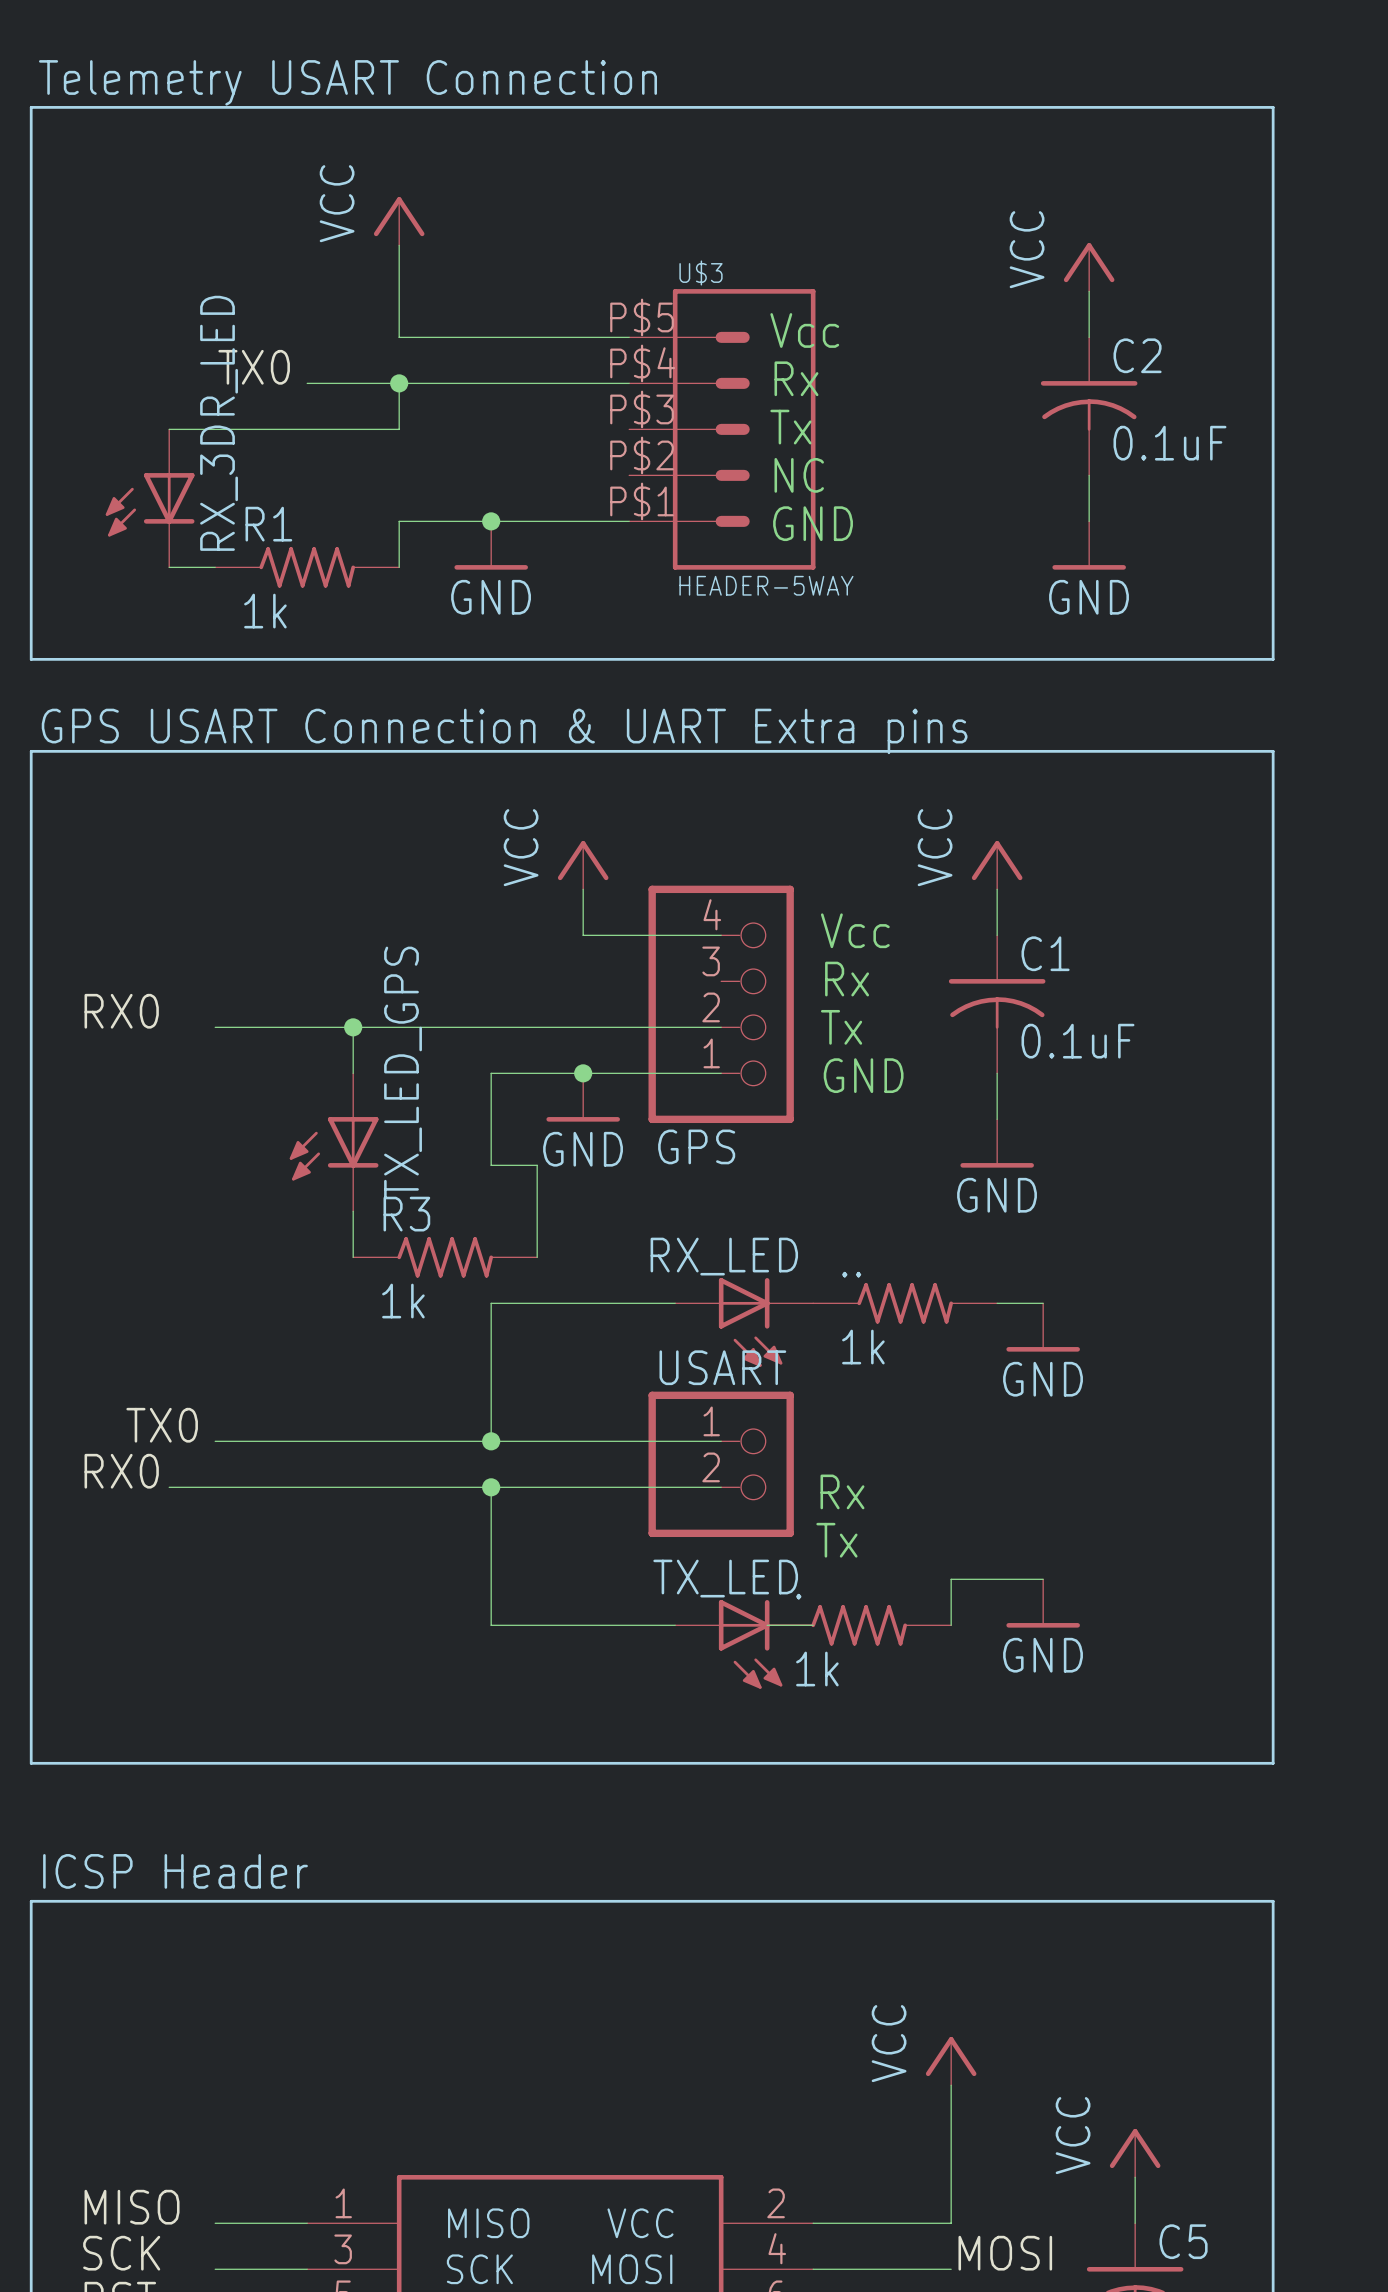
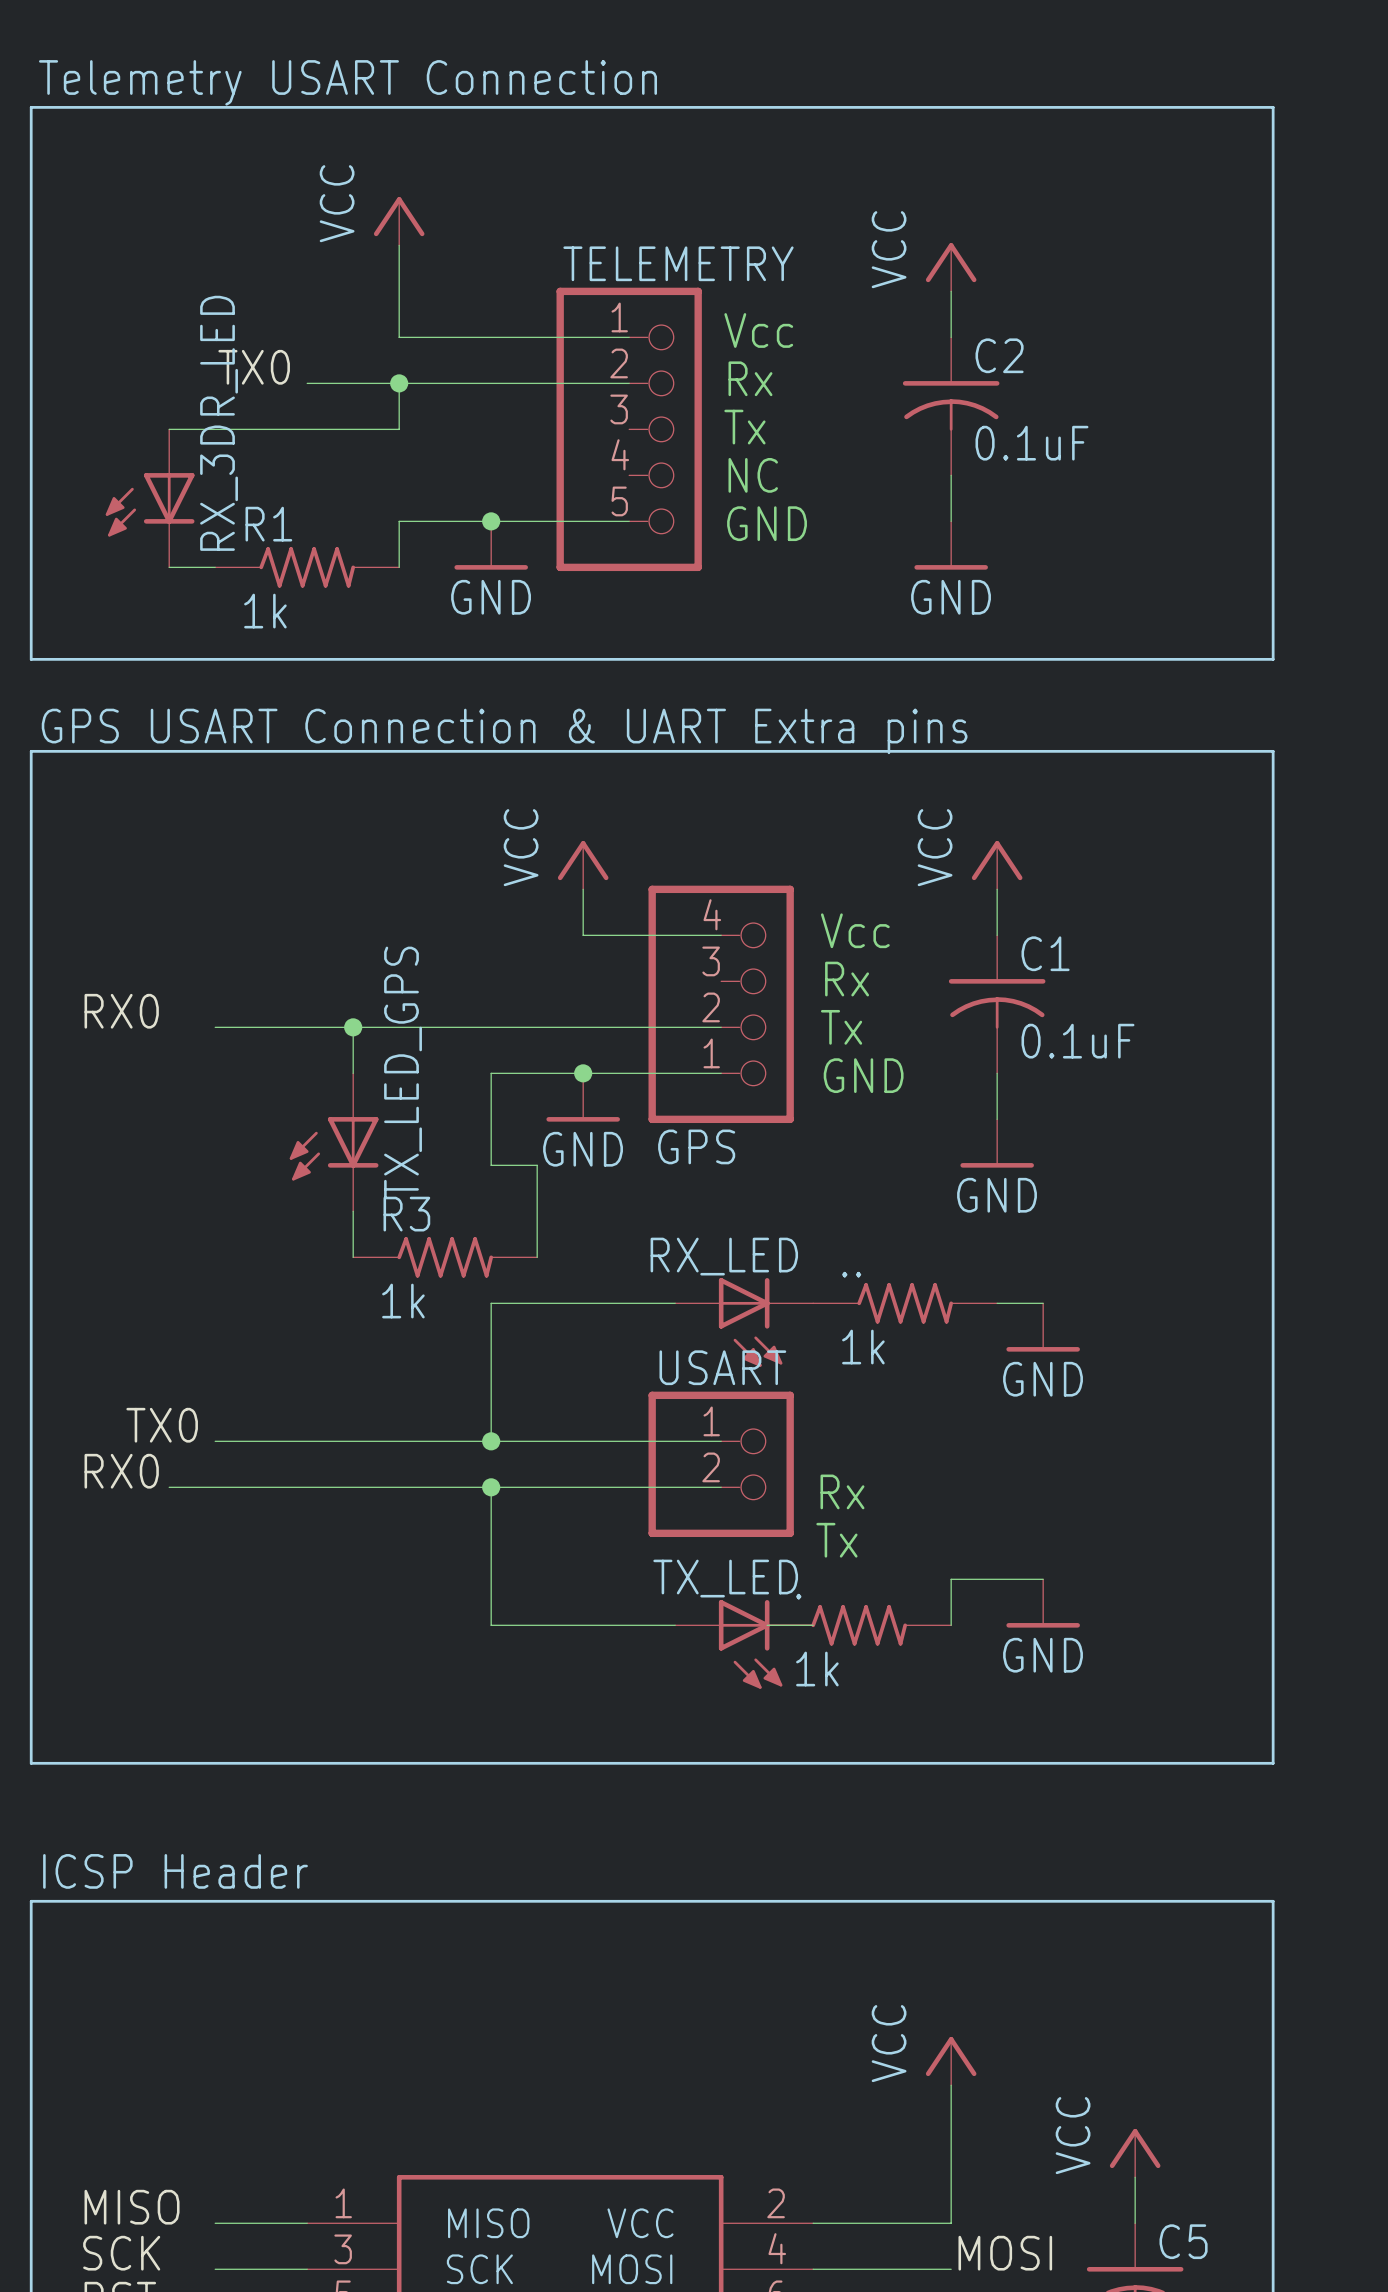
power symbol position: VCC (1089, 267) -> VCC (951, 267)
wire: (1089, 291) (1089, 337) -> (951, 291) (951, 337)
text position: Vcc (804, 330) -> Vcc (758, 330)
text position: Rx (796, 378) -> Rx (750, 378)
C2 position: (1089, 406) -> (951, 406)
text position: Tx (790, 427) -> Tx (744, 427)
TELEMETRY: none -> (629, 429)
U$3: HEADER-5WAY (722, 429) -> none
text position: NC (799, 475) -> NC (753, 475)
wire: (1089, 475) (1089, 521) -> (951, 475) (951, 521)
text position: GND (813, 523) -> GND (767, 523)
power symbol position: GND (1089, 545) -> GND (951, 545)

